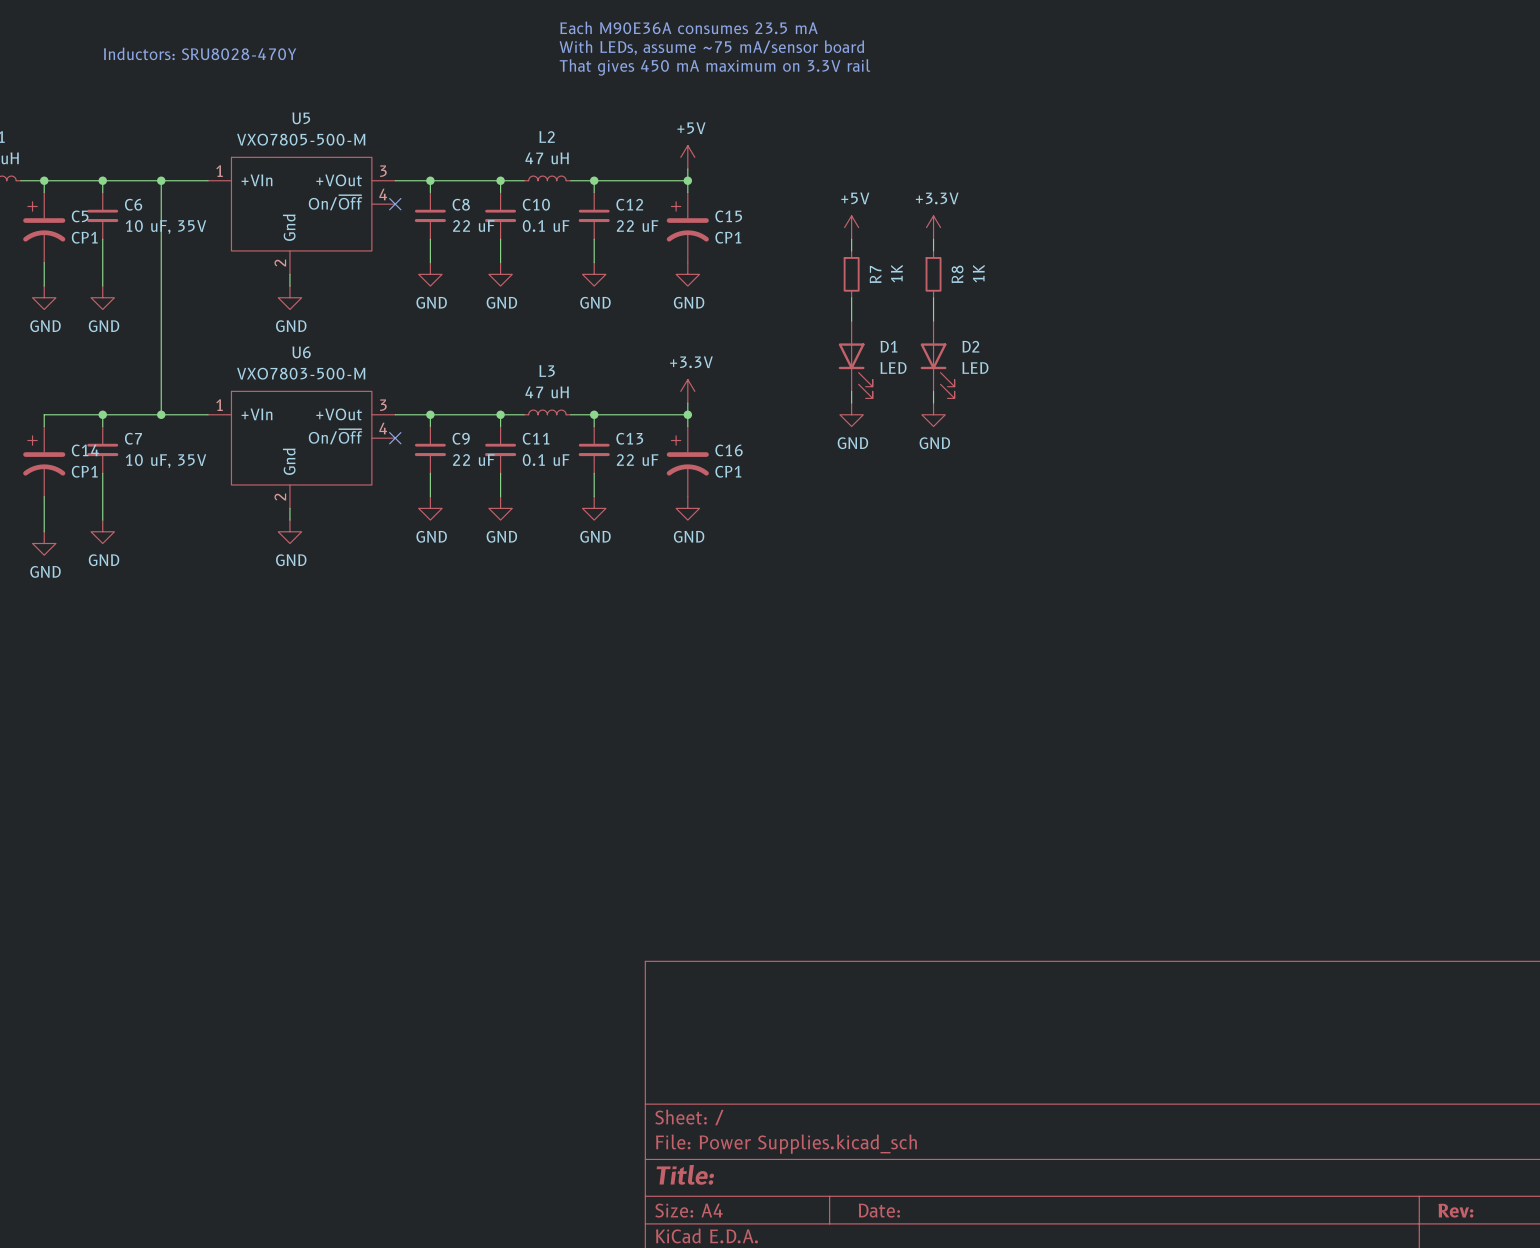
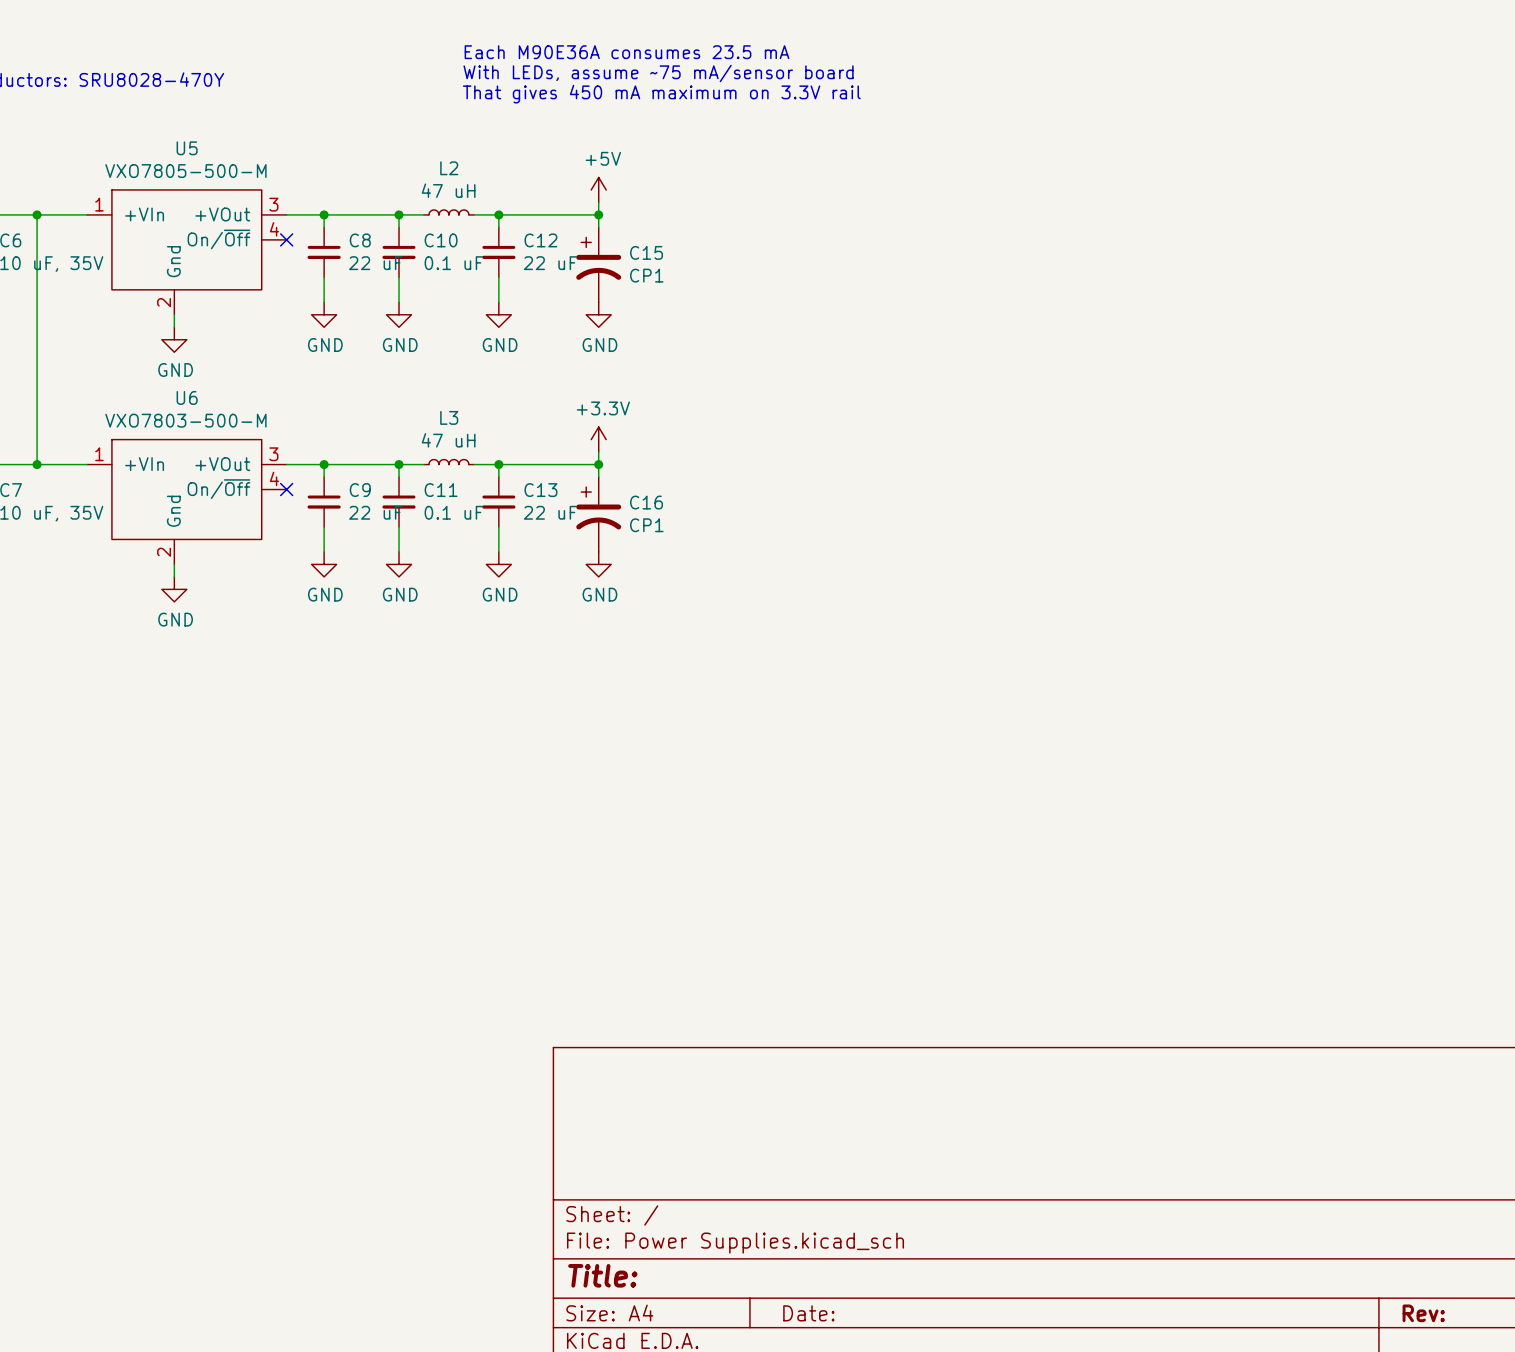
power symbol: +5V (851, 227) -> none
power symbol: +3.3V (933, 227) -> none
wire: (851, 239) (851, 250) -> none
wire: (933, 239) (933, 250) -> none
R7: 1K (851, 274) -> none
R8: 1K (933, 274) -> none
wire: (851, 297) (851, 321) -> none
wire: (933, 297) (933, 321) -> none
D1: LED (855, 359) -> none
D2: LED (937, 359) -> none
wire: (851, 391) (851, 403) -> none
wire: (933, 391) (933, 403) -> none
power symbol: GND (851, 414) -> none
power symbol: GND (933, 414) -> none

